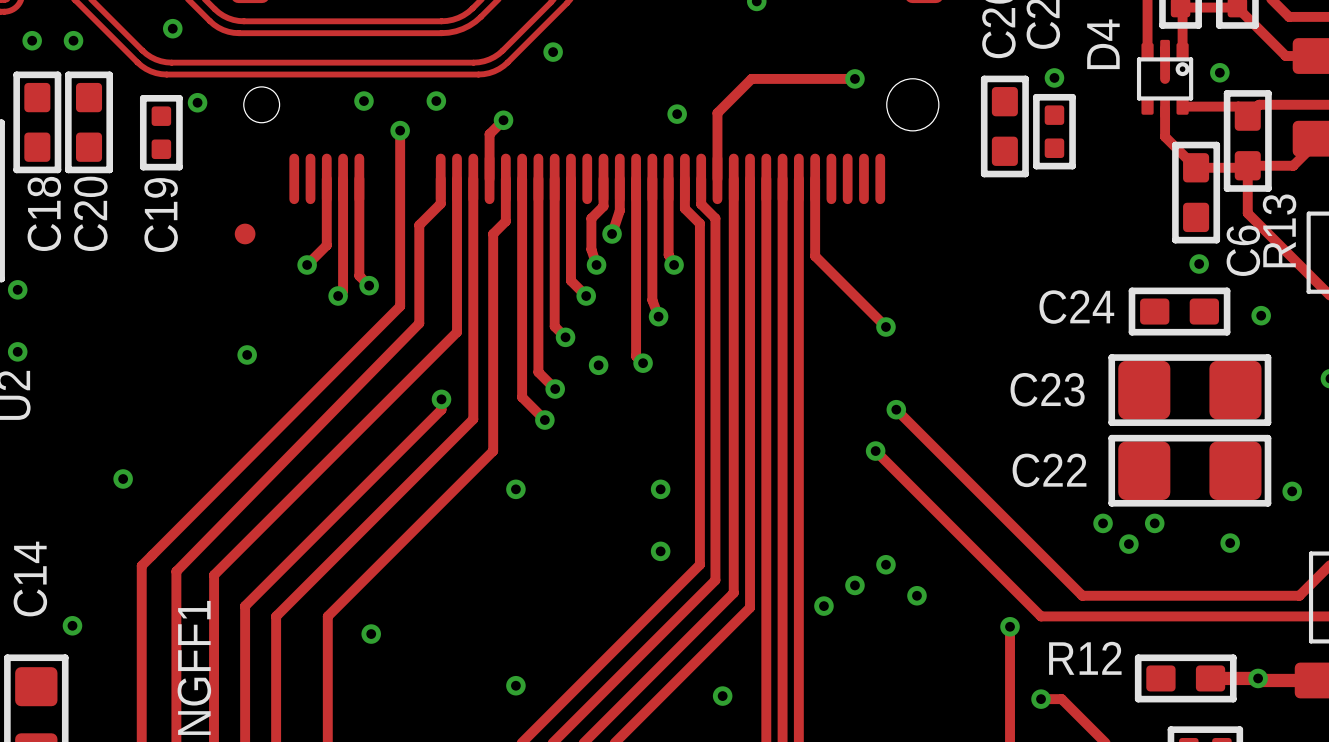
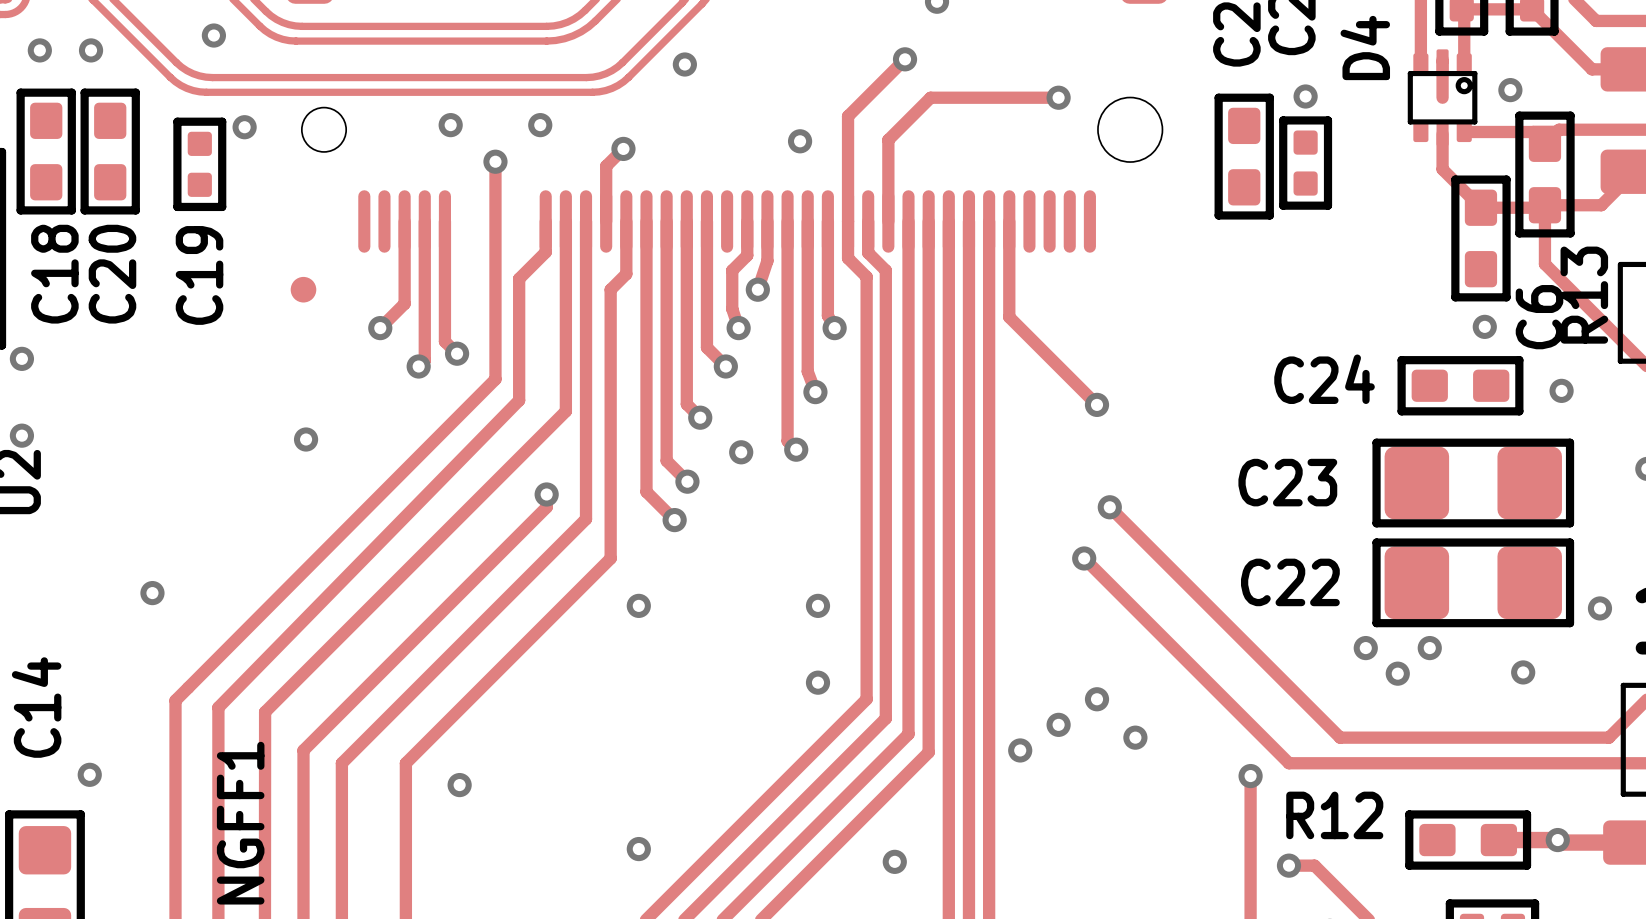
track: none -> (905, 59) (848, 116) (848, 221)
via: none -> (905, 59)
via position: (677, 114) -> (800, 141)

